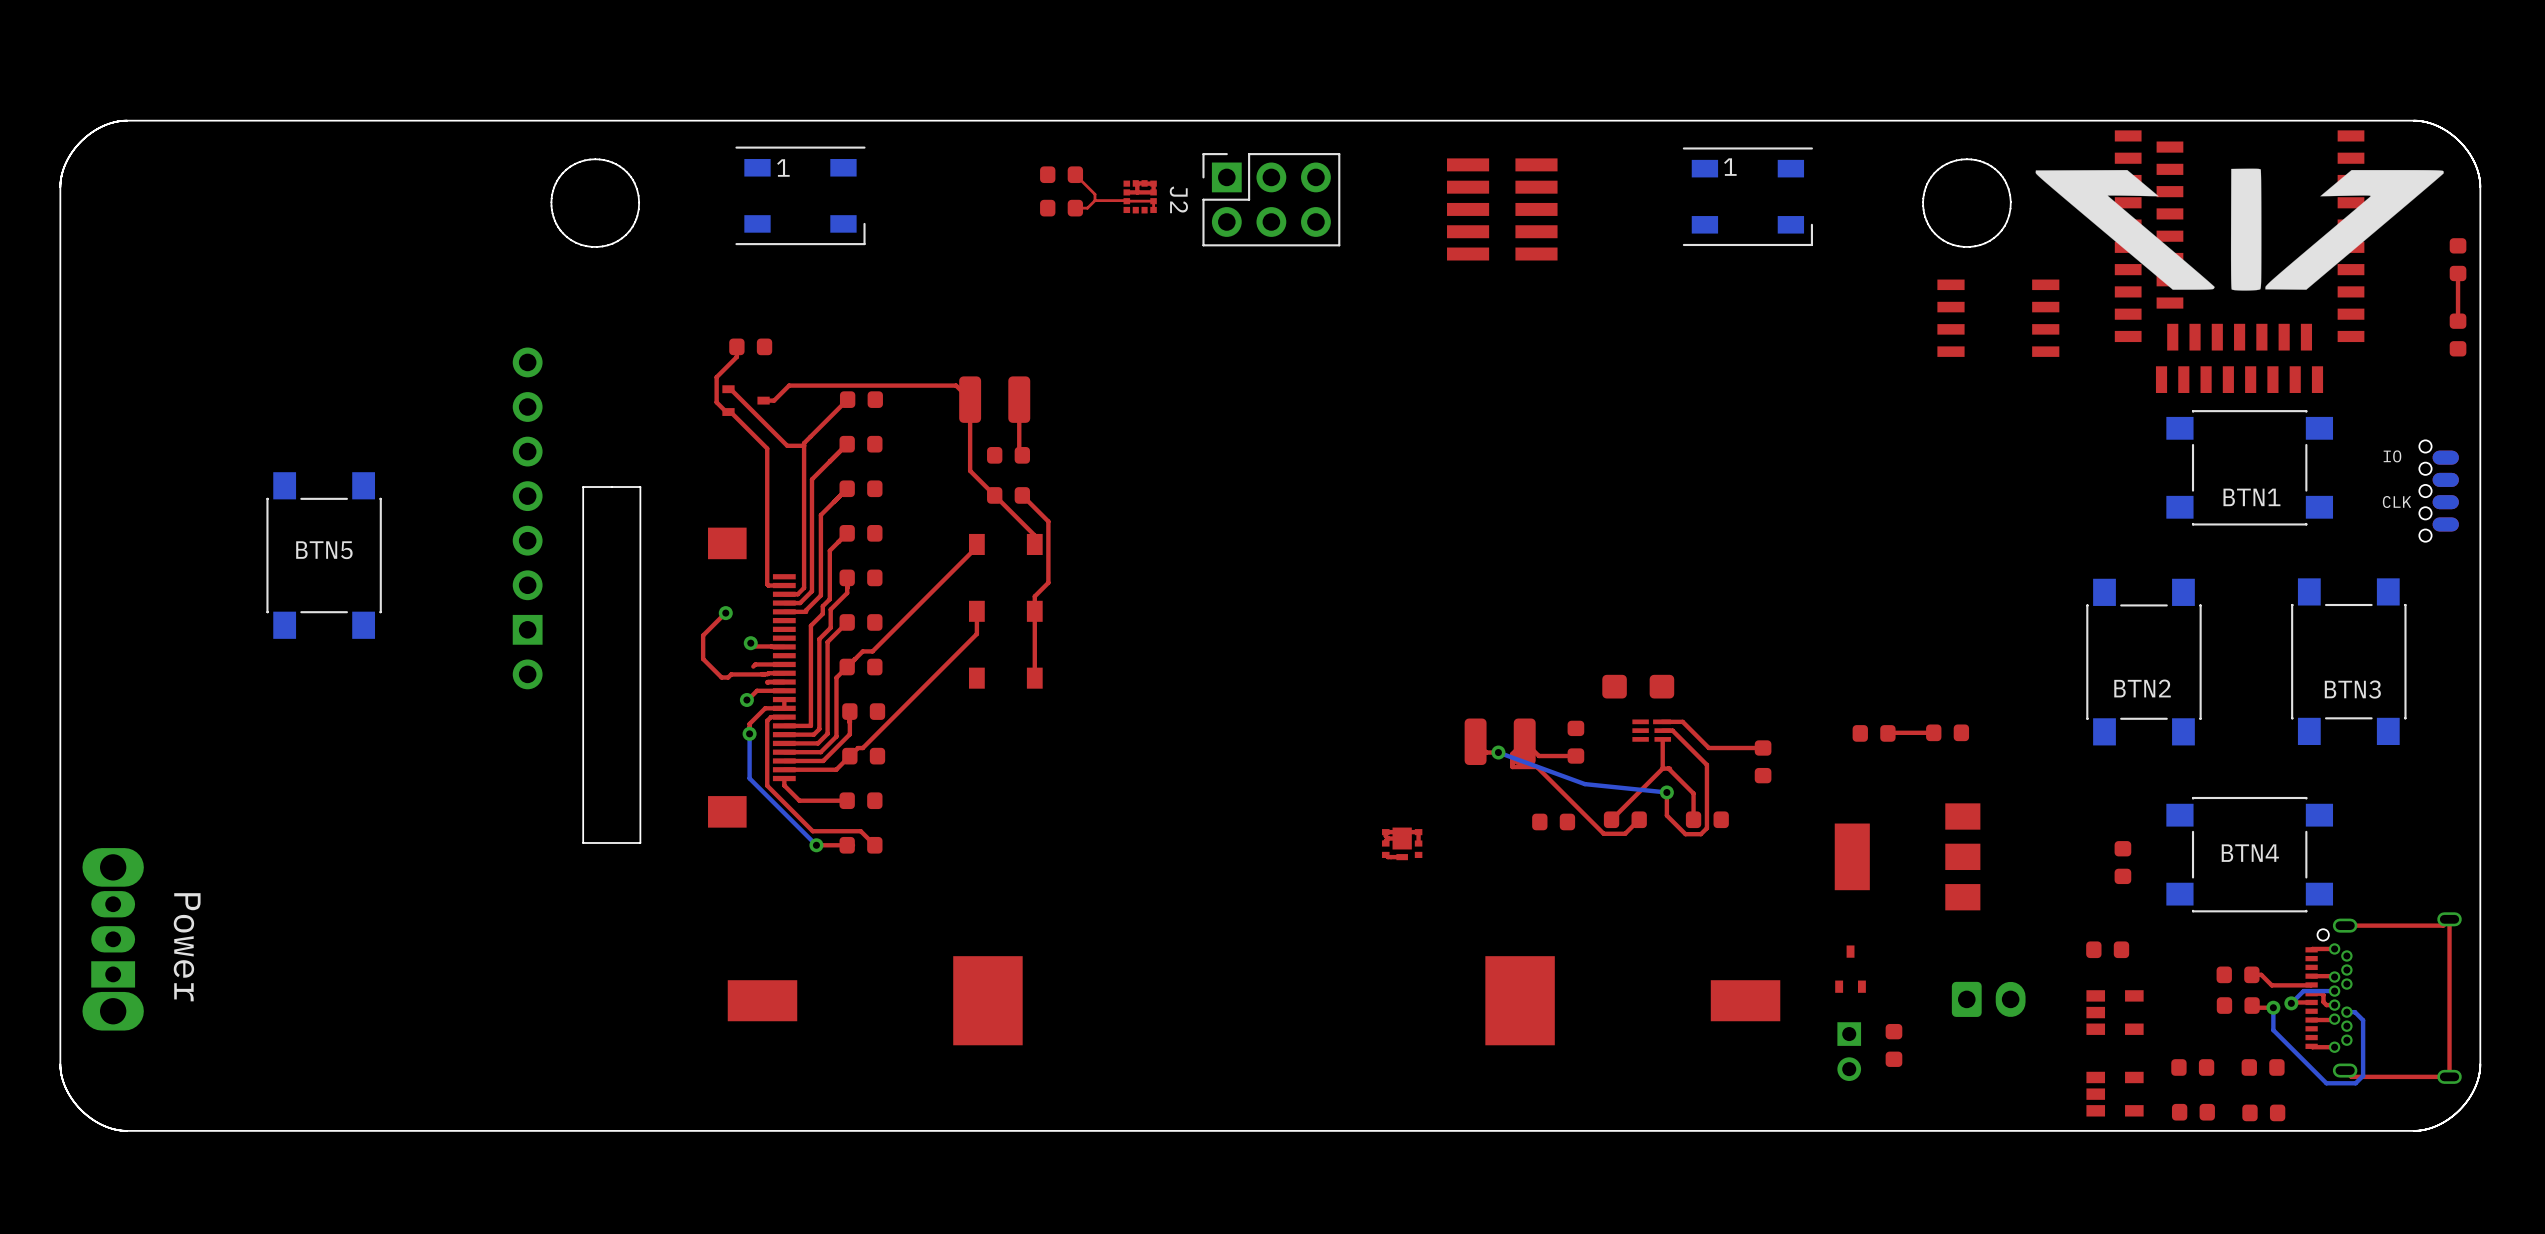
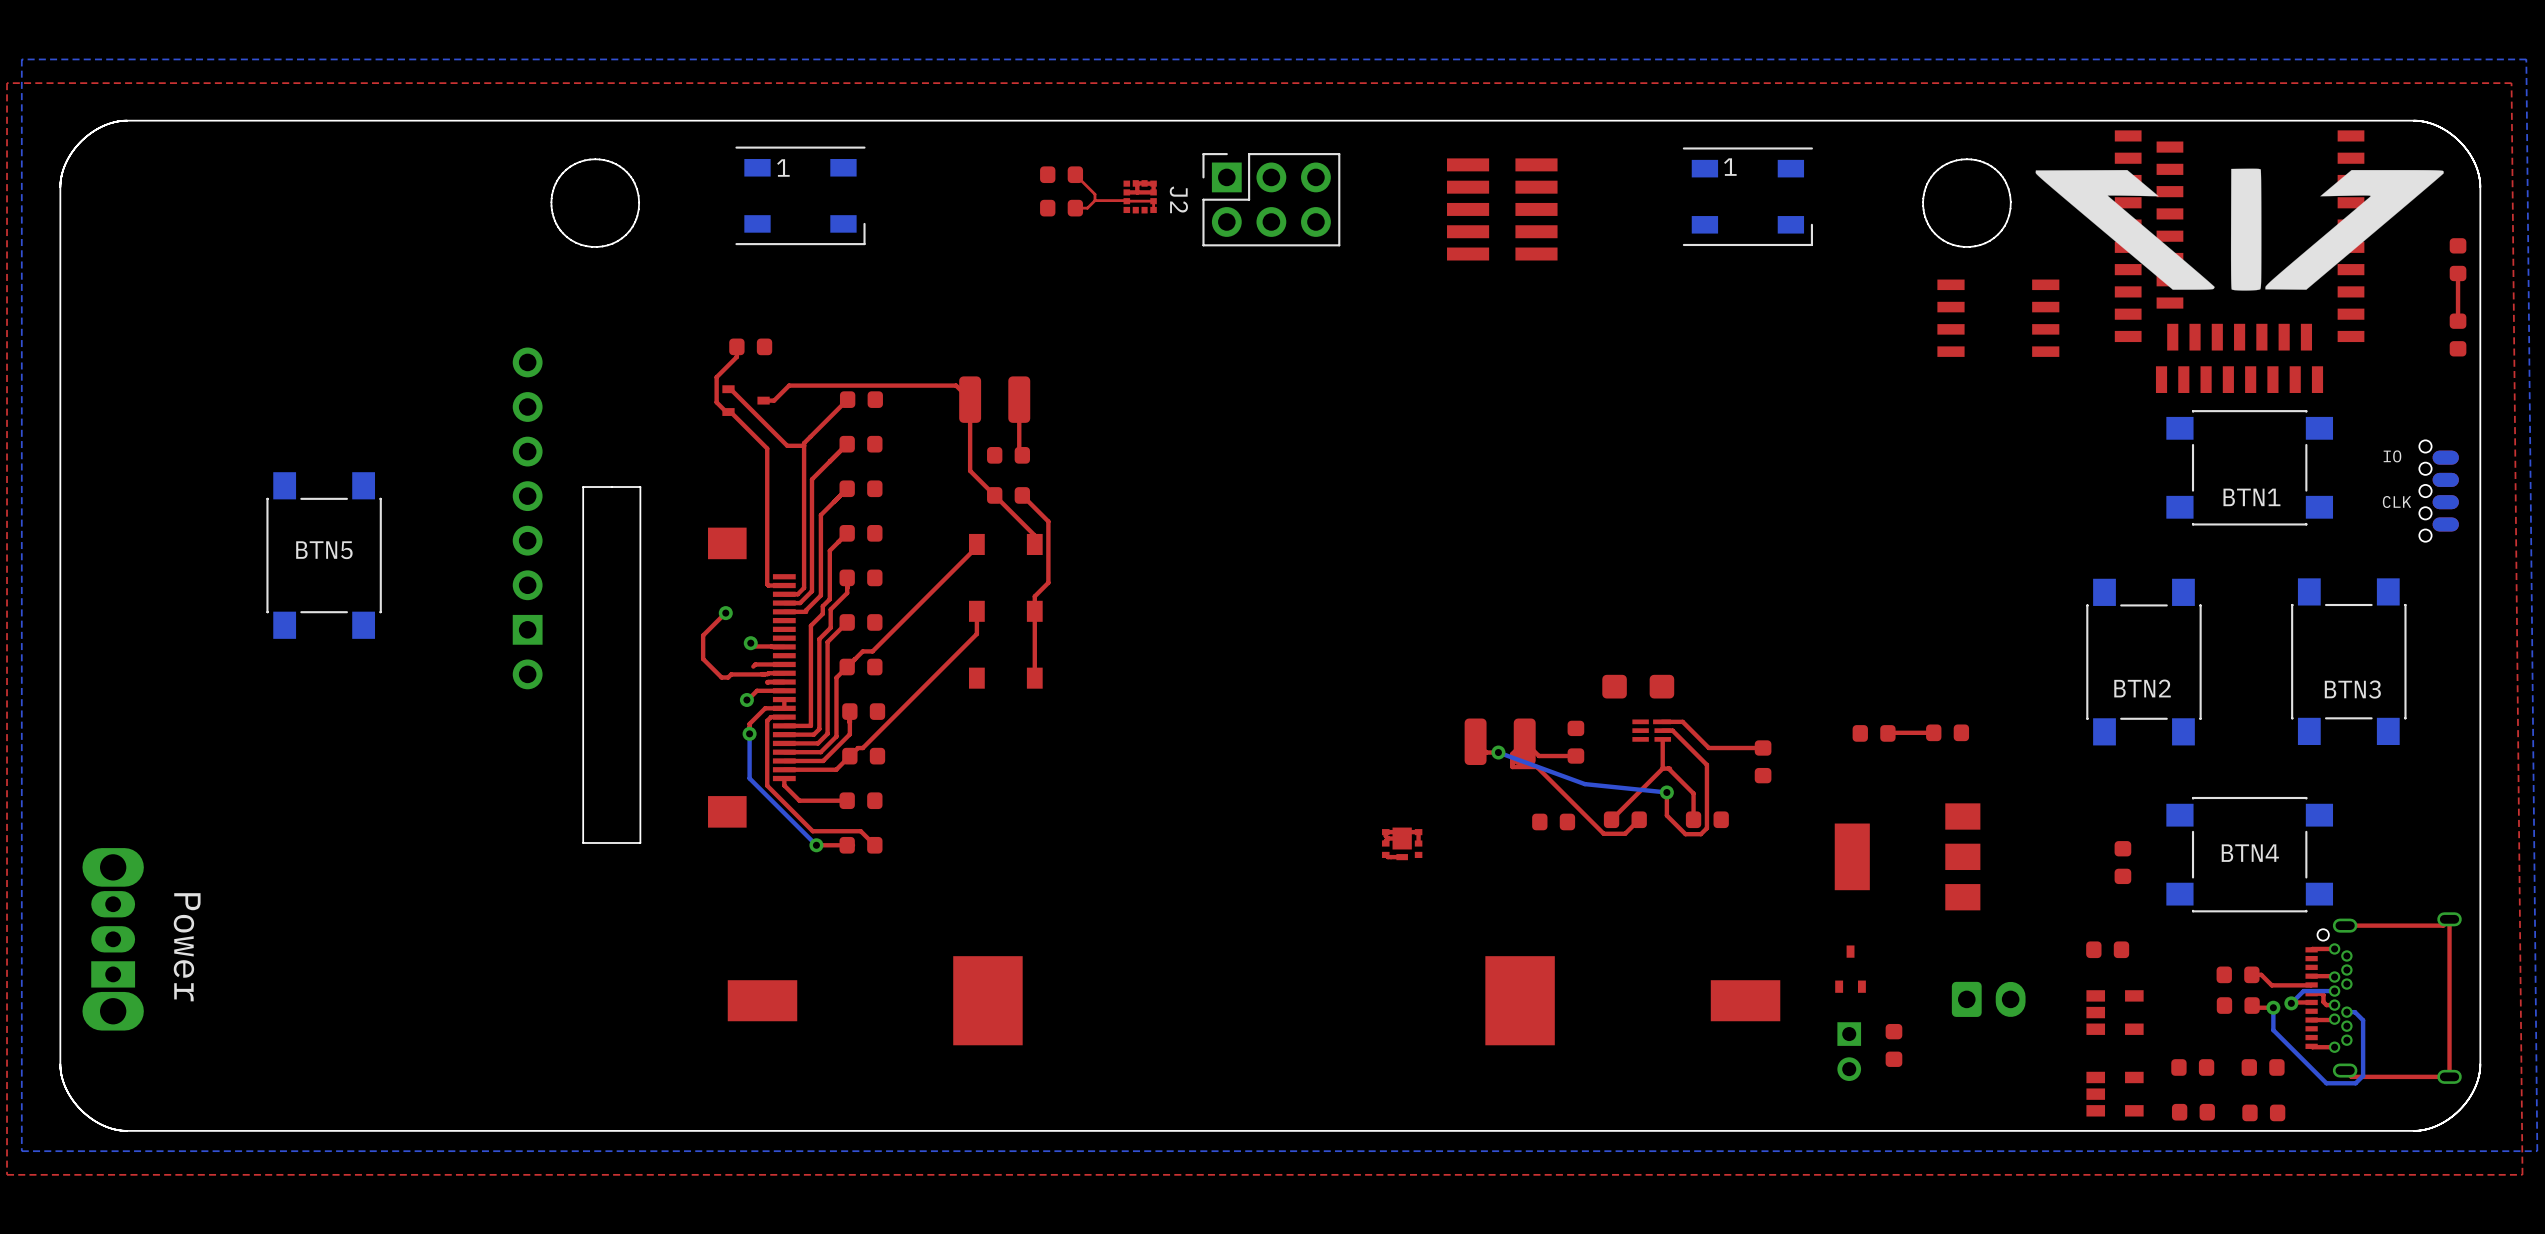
bottom zone outline: none -> (2526, 59) (21, 59) (21, 1151) (2537, 1151) (2526, 59)
top zone outline: none -> (2511, 83) (7, 83) (7, 1174) (2522, 1174) (2511, 83)

